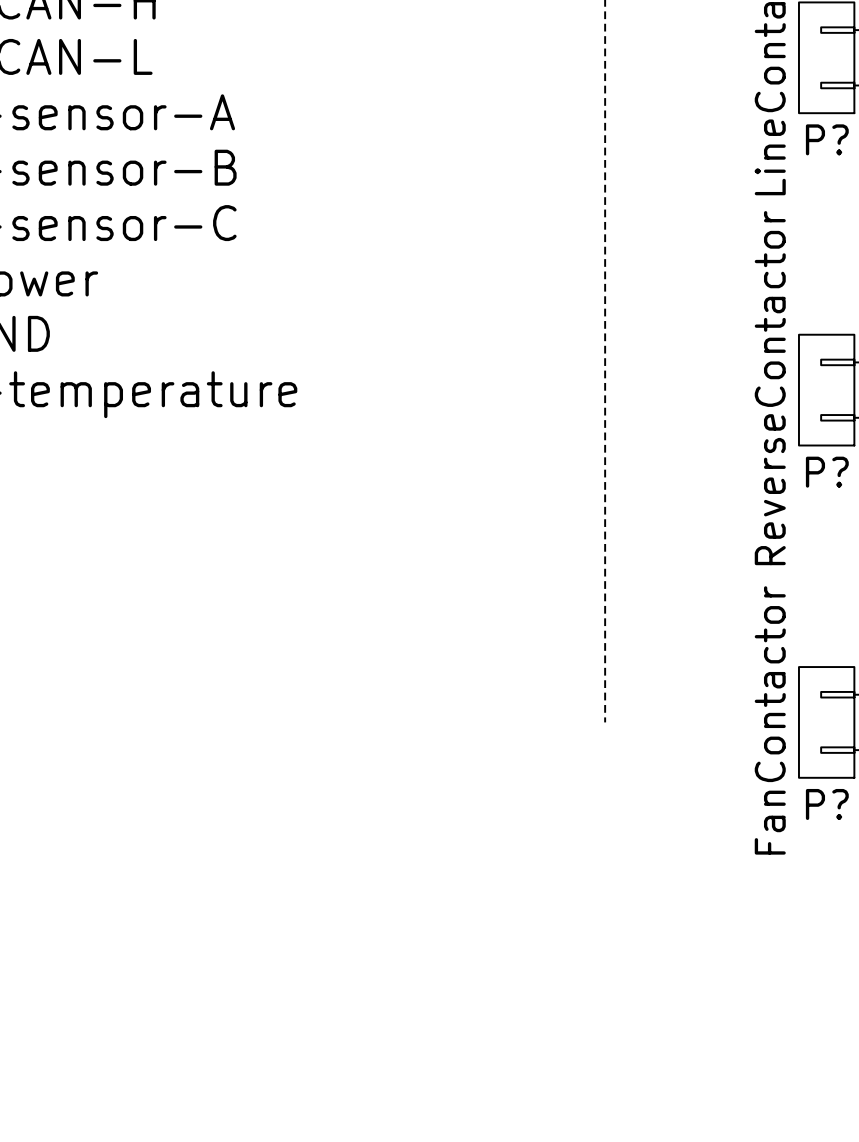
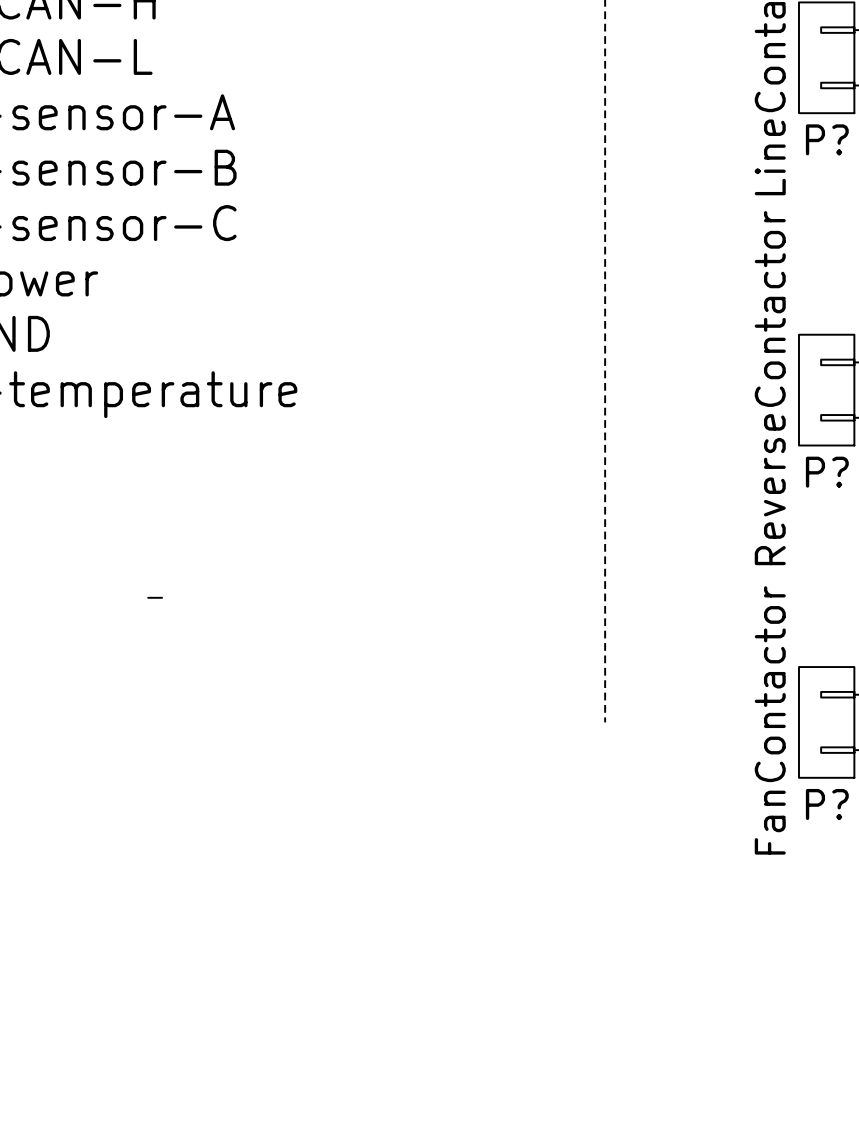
wire: none -> (148, 597) (162, 597)

